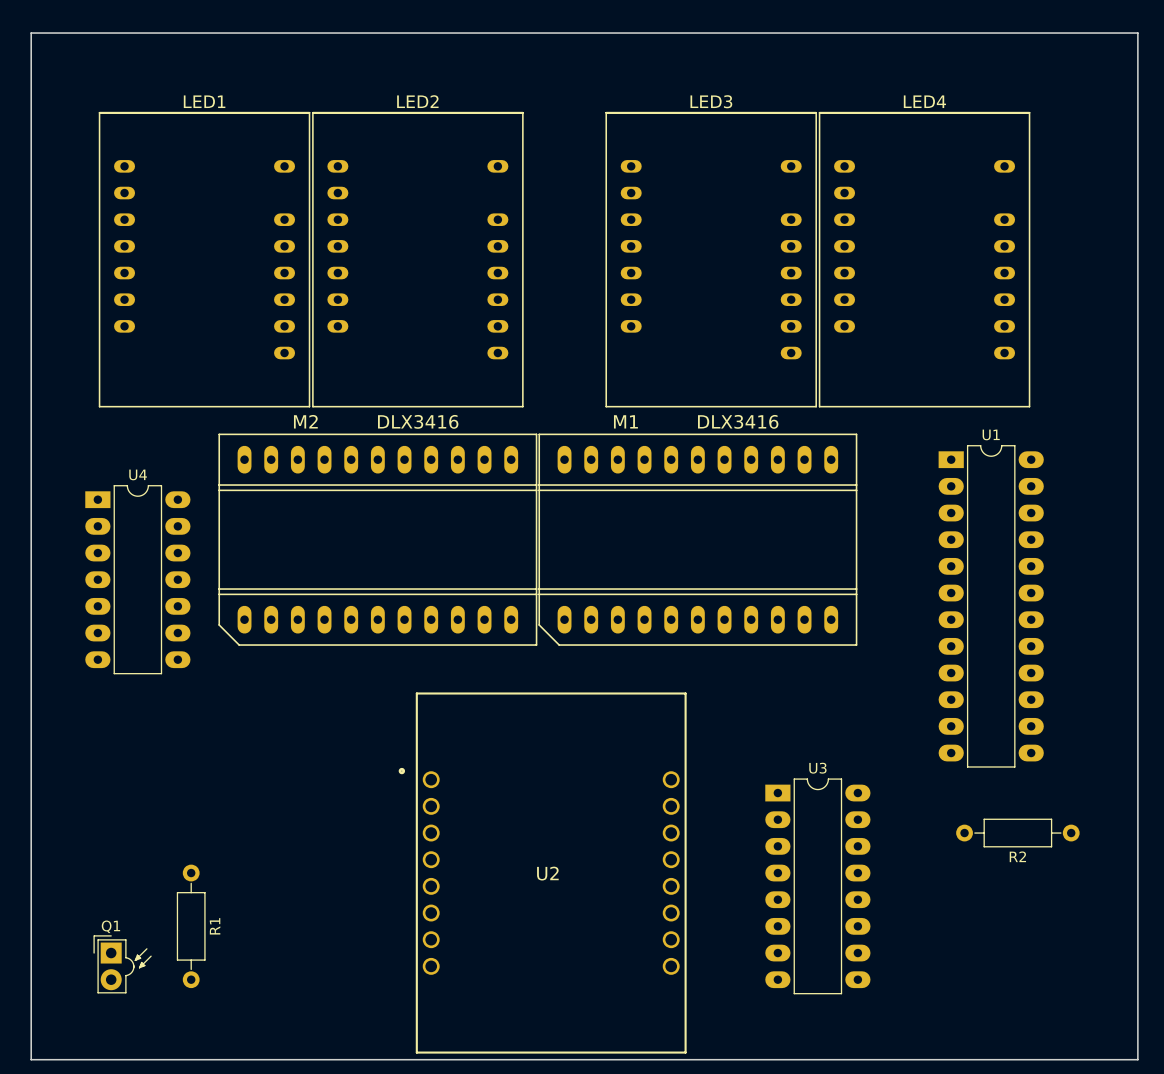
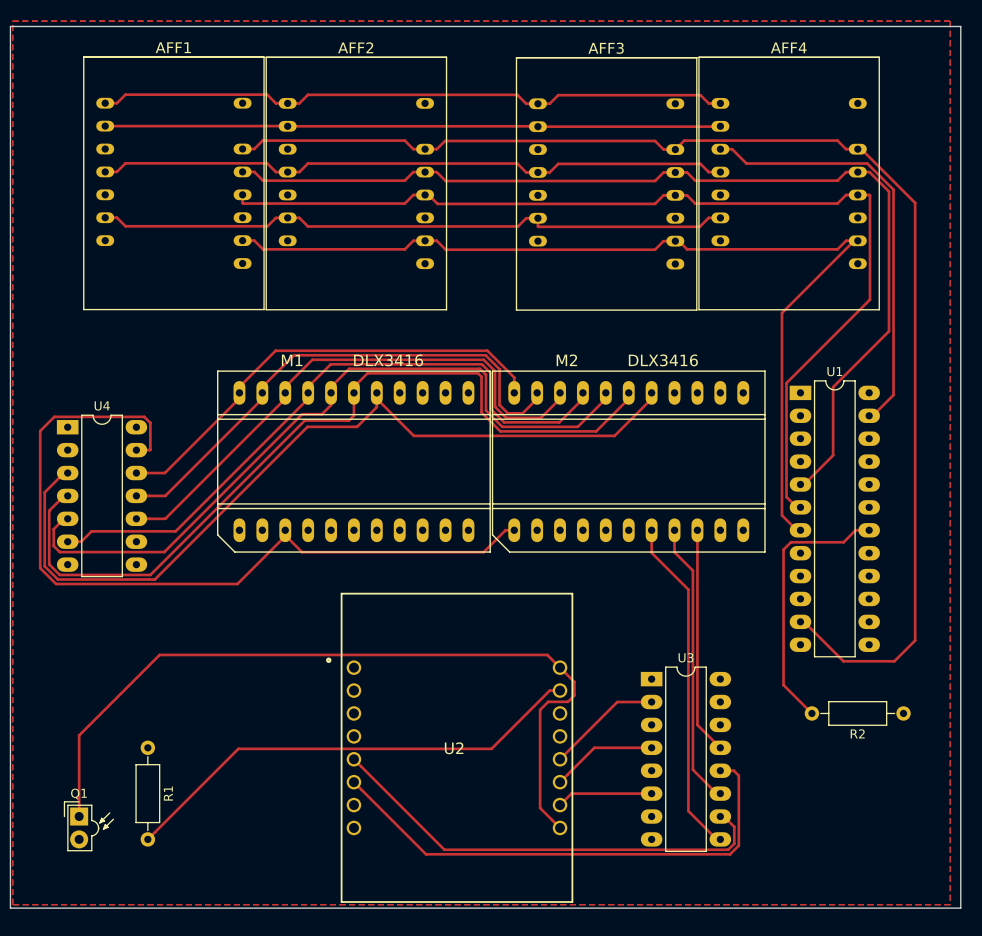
zone outline: none -> (12, 21) (950, 21) (950, 904) (12, 904) (12, 21)
track: none -> (105, 103) (116, 103) (125, 94) (267, 94) (275, 103) (299, 103) (307, 94) (517, 94) (526, 103) (549, 103) (558, 95) (700, 95) (708, 103) (720, 103)
track: none -> (105, 126) (720, 126)
track: none -> (242, 149) (254, 149) (262, 140) (404, 140) (413, 149) (436, 149) (445, 140) (655, 140) (663, 149) (675, 149) (684, 140) (837, 140) (846, 149) (861, 149) (915, 202) (915, 640) (894, 661) (843, 661) (804, 621) (800, 621)
track: none -> (720, 149) (732, 149) (746, 163) (867, 163) (893, 189) (893, 395) (872, 415) (869, 415)
track: none -> (105, 171) (116, 171) (125, 163) (267, 163) (275, 172) (299, 172) (307, 163) (517, 163) (526, 172) (549, 172) (558, 163) (700, 163) (708, 172) (720, 172)
track: none -> (242, 171) (254, 171) (263, 180) (404, 180) (413, 172) (436, 172) (445, 181) (655, 181) (663, 172) (687, 172) (695, 180) (837, 180) (846, 172) (869, 172) (889, 191) (889, 331) (833, 387) (833, 455) (804, 484) (800, 484)
AFF1: none -> (173, 183)
AFF2: none -> (356, 183)
AFF4: none -> (789, 183)
AFF3: none -> (606, 183)
track: none -> (242, 194) (243, 203) (404, 203) (413, 194) (428, 194) (437, 203) (655, 203) (663, 195) (687, 195) (695, 203) (837, 203) (846, 194) (869, 194) (869, 299) (786, 383) (786, 497) (796, 507) (800, 507)
track: none -> (105, 217) (116, 217) (125, 226) (267, 226) (275, 217) (299, 217) (307, 226) (518, 226) (526, 218) (537, 218) (538, 226) (699, 226) (708, 217) (720, 217)
LED1: (204, 259) -> none
LED2: (417, 259) -> none
LED3: (711, 259) -> none
LED4: (924, 259) -> none
track: none -> (242, 240) (254, 240) (263, 249) (404, 249) (413, 240) (436, 240) (445, 249) (655, 249) (663, 241) (678, 241) (687, 249) (837, 249) (846, 240) (857, 240)
track: none -> (854, 240) (782, 313) (782, 515) (796, 530) (800, 530)
track: none -> (376, 392) (376, 407) (357, 426) (307, 426) (154, 579) (57, 579) (44, 566) (44, 492) (64, 473) (67, 473)
track: none -> (514, 392) (514, 377) (487, 350) (275, 350) (239, 386) (239, 398) (164, 473) (136, 473)
track: none -> (537, 392) (537, 398) (522, 413) (507, 413) (499, 404) (499, 369) (485, 355) (293, 355) (262, 386) (262, 398) (165, 495) (136, 495)
track: none -> (560, 392) (560, 398) (541, 417) (506, 417) (495, 406) (495, 371) (483, 359) (312, 359) (285, 386) (285, 398) (165, 518) (136, 518)
track: none -> (582, 392) (582, 398) (559, 422) (504, 422) (490, 408) (490, 372) (481, 364) (330, 364) (308, 386) (308, 398) (175, 531) (91, 531) (81, 541) (67, 541)
track: none -> (605, 392) (605, 398) (577, 426) (502, 426) (486, 410) (486, 374) (480, 368) (349, 368) (331, 386) (331, 405) (321, 414) (302, 414) (164, 552) (59, 552) (53, 546) (53, 529) (64, 518) (67, 518)
track: none -> (628, 392) (628, 398) (596, 431) (500, 431) (481, 412) (481, 376) (478, 373) (367, 373) (353, 386) (353, 415) (348, 420) (304, 420) (150, 574) (59, 574) (49, 564) (49, 510) (64, 495) (67, 495)
track: none -> (651, 392) (651, 398) (614, 435) (413, 435) (376, 398)
track: none -> (136, 450) (150, 449) (150, 422) (144, 416) (54, 416) (40, 431) (40, 568) (56, 584) (237, 584) (285, 536) (285, 530)
M2 position: (377, 539) -> (628, 461)
M1 position: (697, 539) -> (353, 461)
track: none -> (514, 530) (505, 530) (483, 552) (302, 552) (285, 535)
track: none -> (651, 530) (651, 552) (688, 589) (688, 811) (716, 839) (720, 839)
track: none -> (674, 530) (674, 552) (692, 570) (692, 769) (716, 793) (720, 793)
track: none -> (697, 530) (697, 724) (720, 747)
track: none -> (869, 530) (855, 530) (843, 542) (790, 542) (783, 549) (783, 685) (811, 713)
track: none -> (560, 690) (549, 690) (491, 748) (238, 748) (147, 839)
track: none -> (651, 702) (617, 702) (560, 759)
track: none -> (651, 747) (594, 747) (560, 782)
track: none -> (353, 759) (444, 849) (728, 849) (734, 843) (734, 826) (723, 816) (720, 816)
track: none -> (720, 770) (733, 770) (738, 775) (738, 845) (730, 854) (426, 854) (353, 782)
track: none -> (651, 793) (571, 793) (560, 805)
track: none -> (79, 816) (79, 735) (159, 654) (547, 654) (574, 682) (574, 695) (568, 701) (548, 701) (540, 709) (540, 808) (560, 827)

